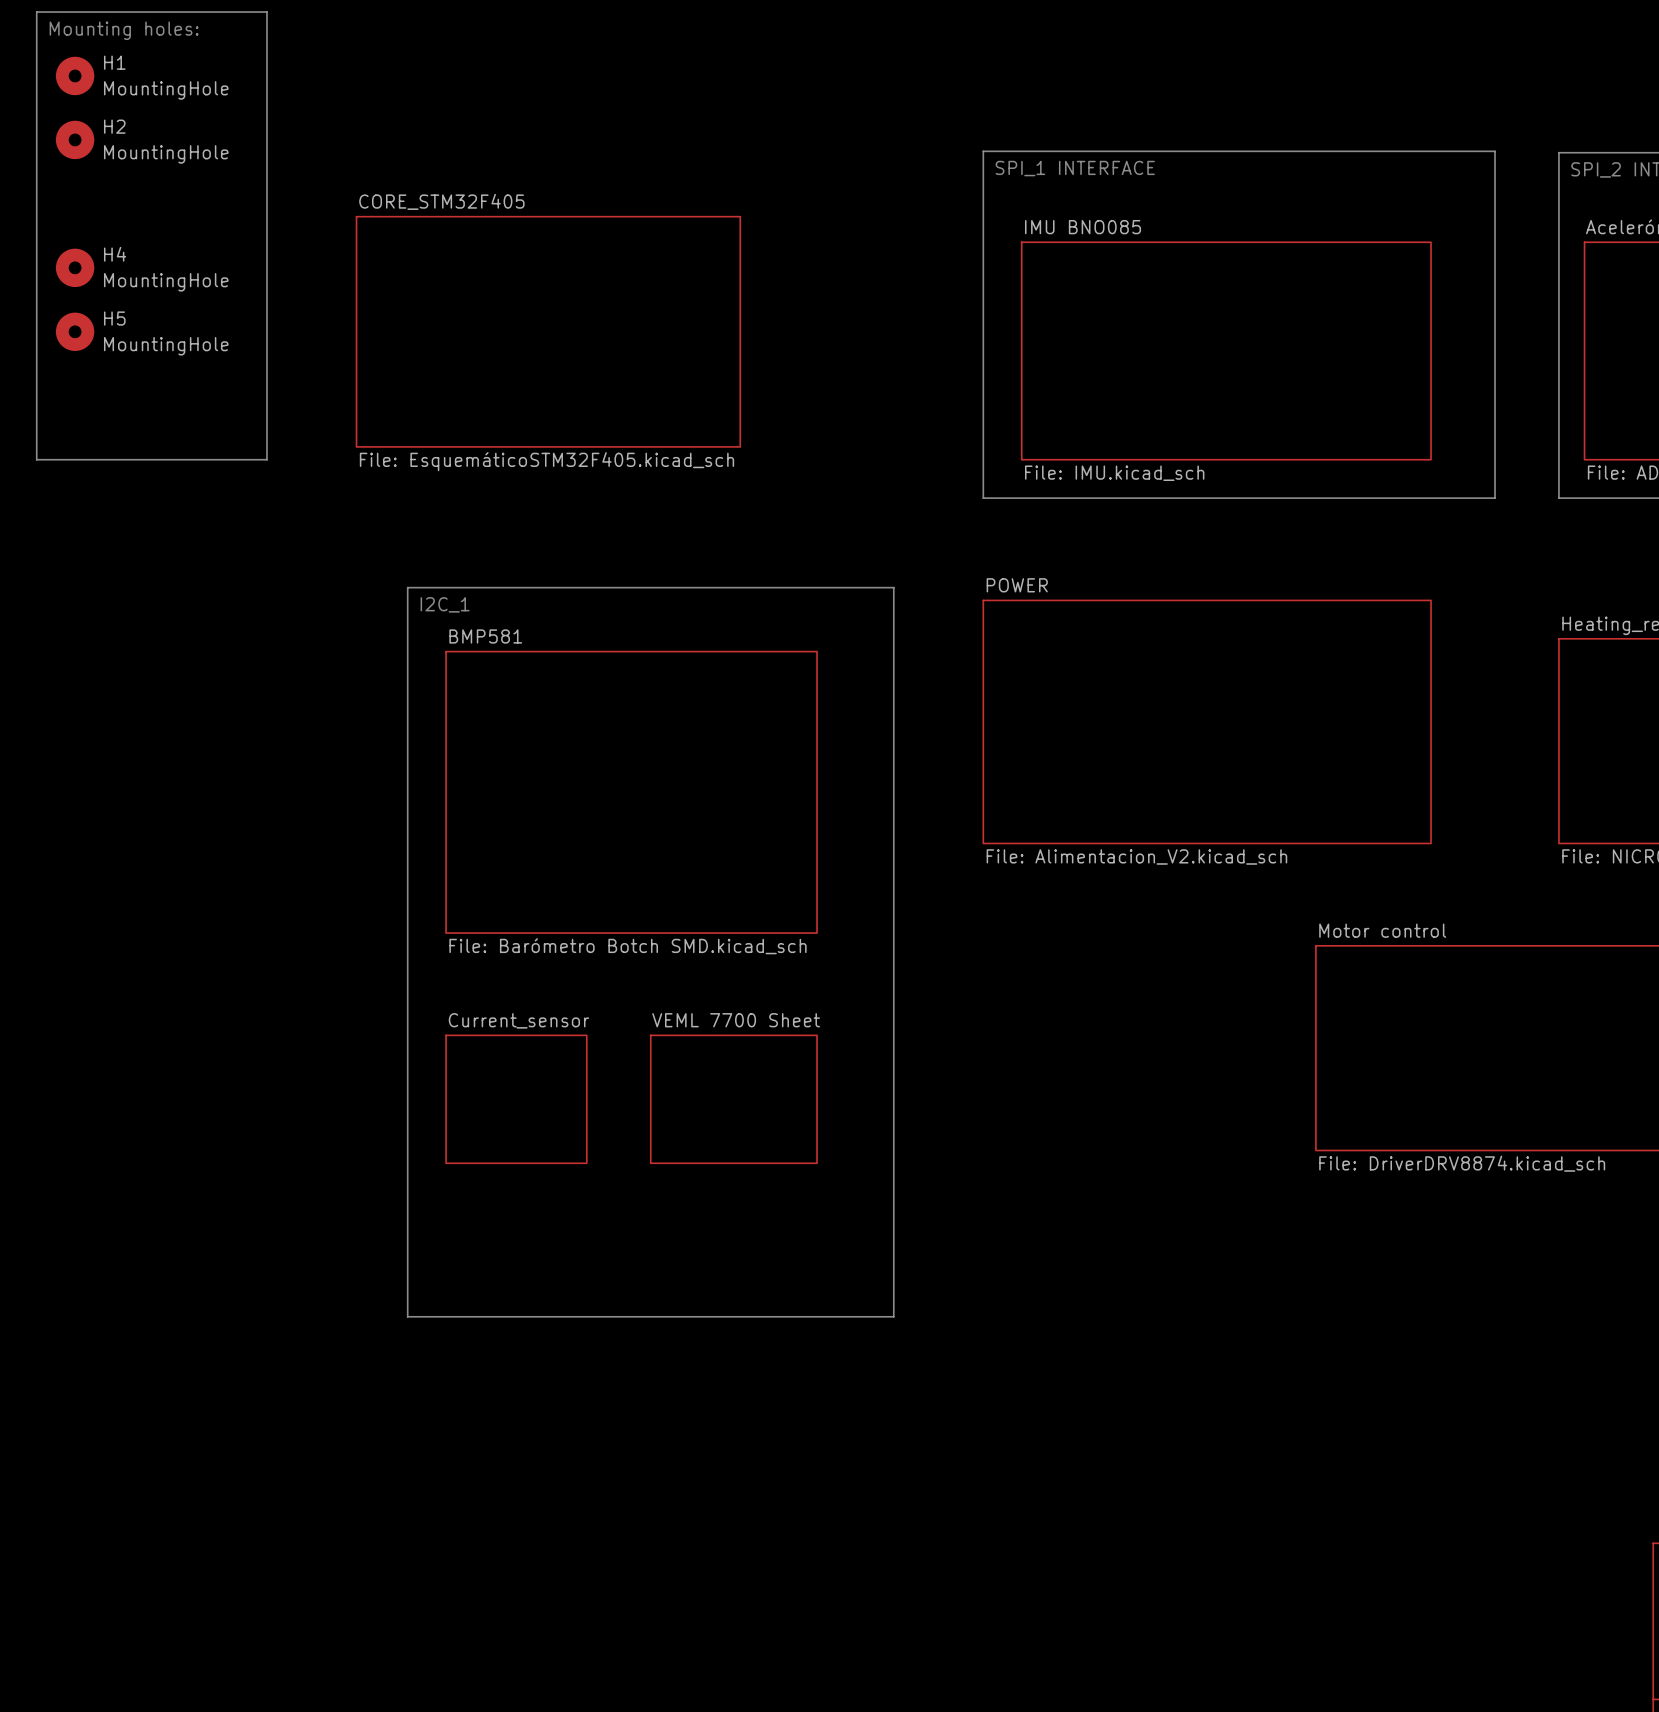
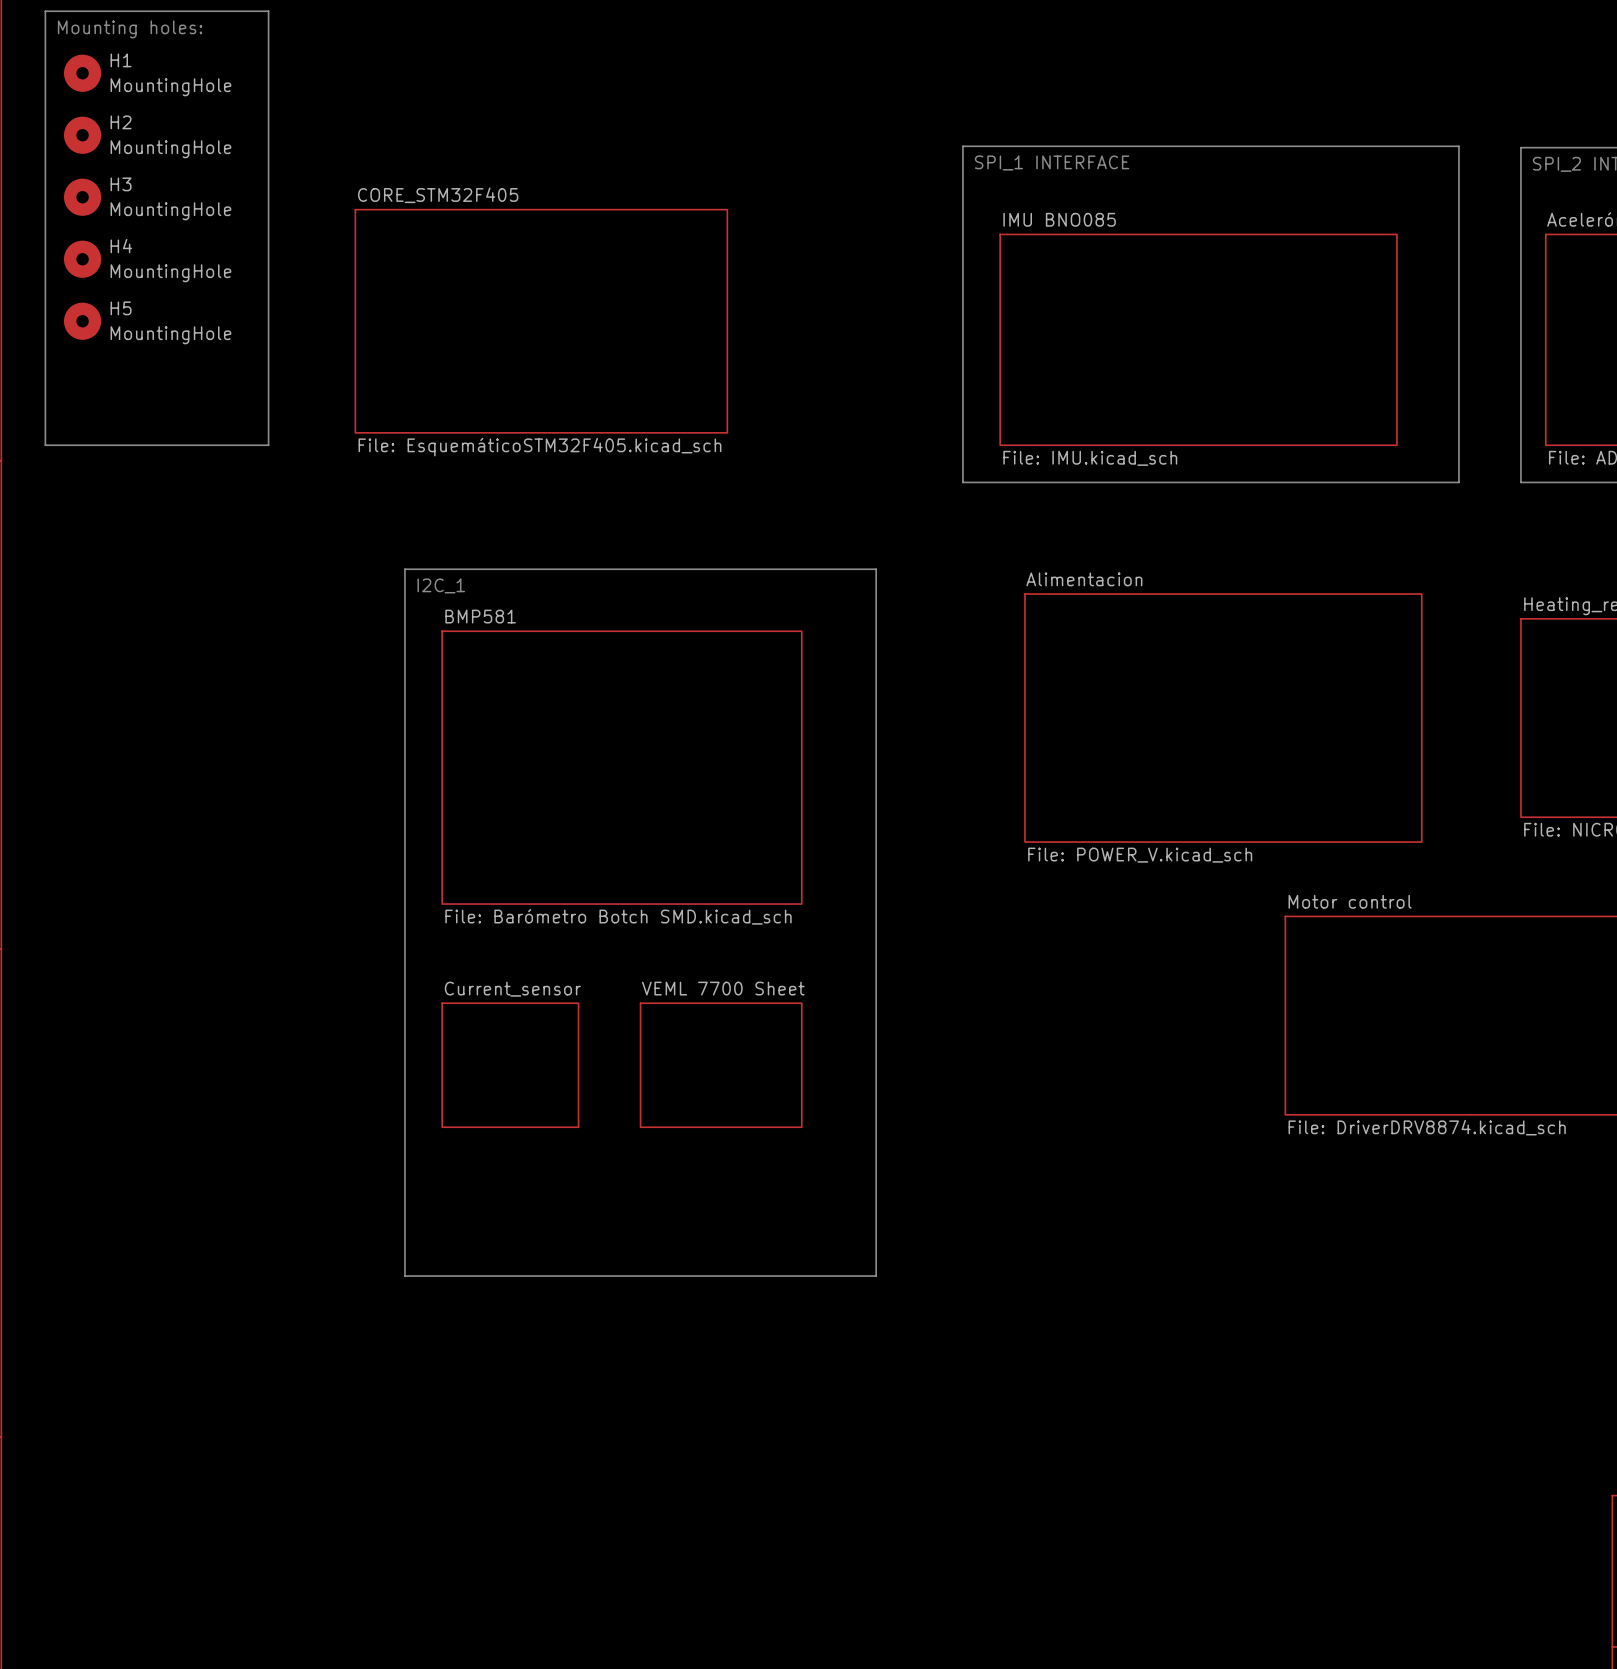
H3: none -> MountingHole (82, 197)
sheet POWER: File: Alimentacion_V2.kicad_sch (1207, 721) -> none
sheet Alimentacion: none -> File: POWER_V.kicad_sch (1223, 718)

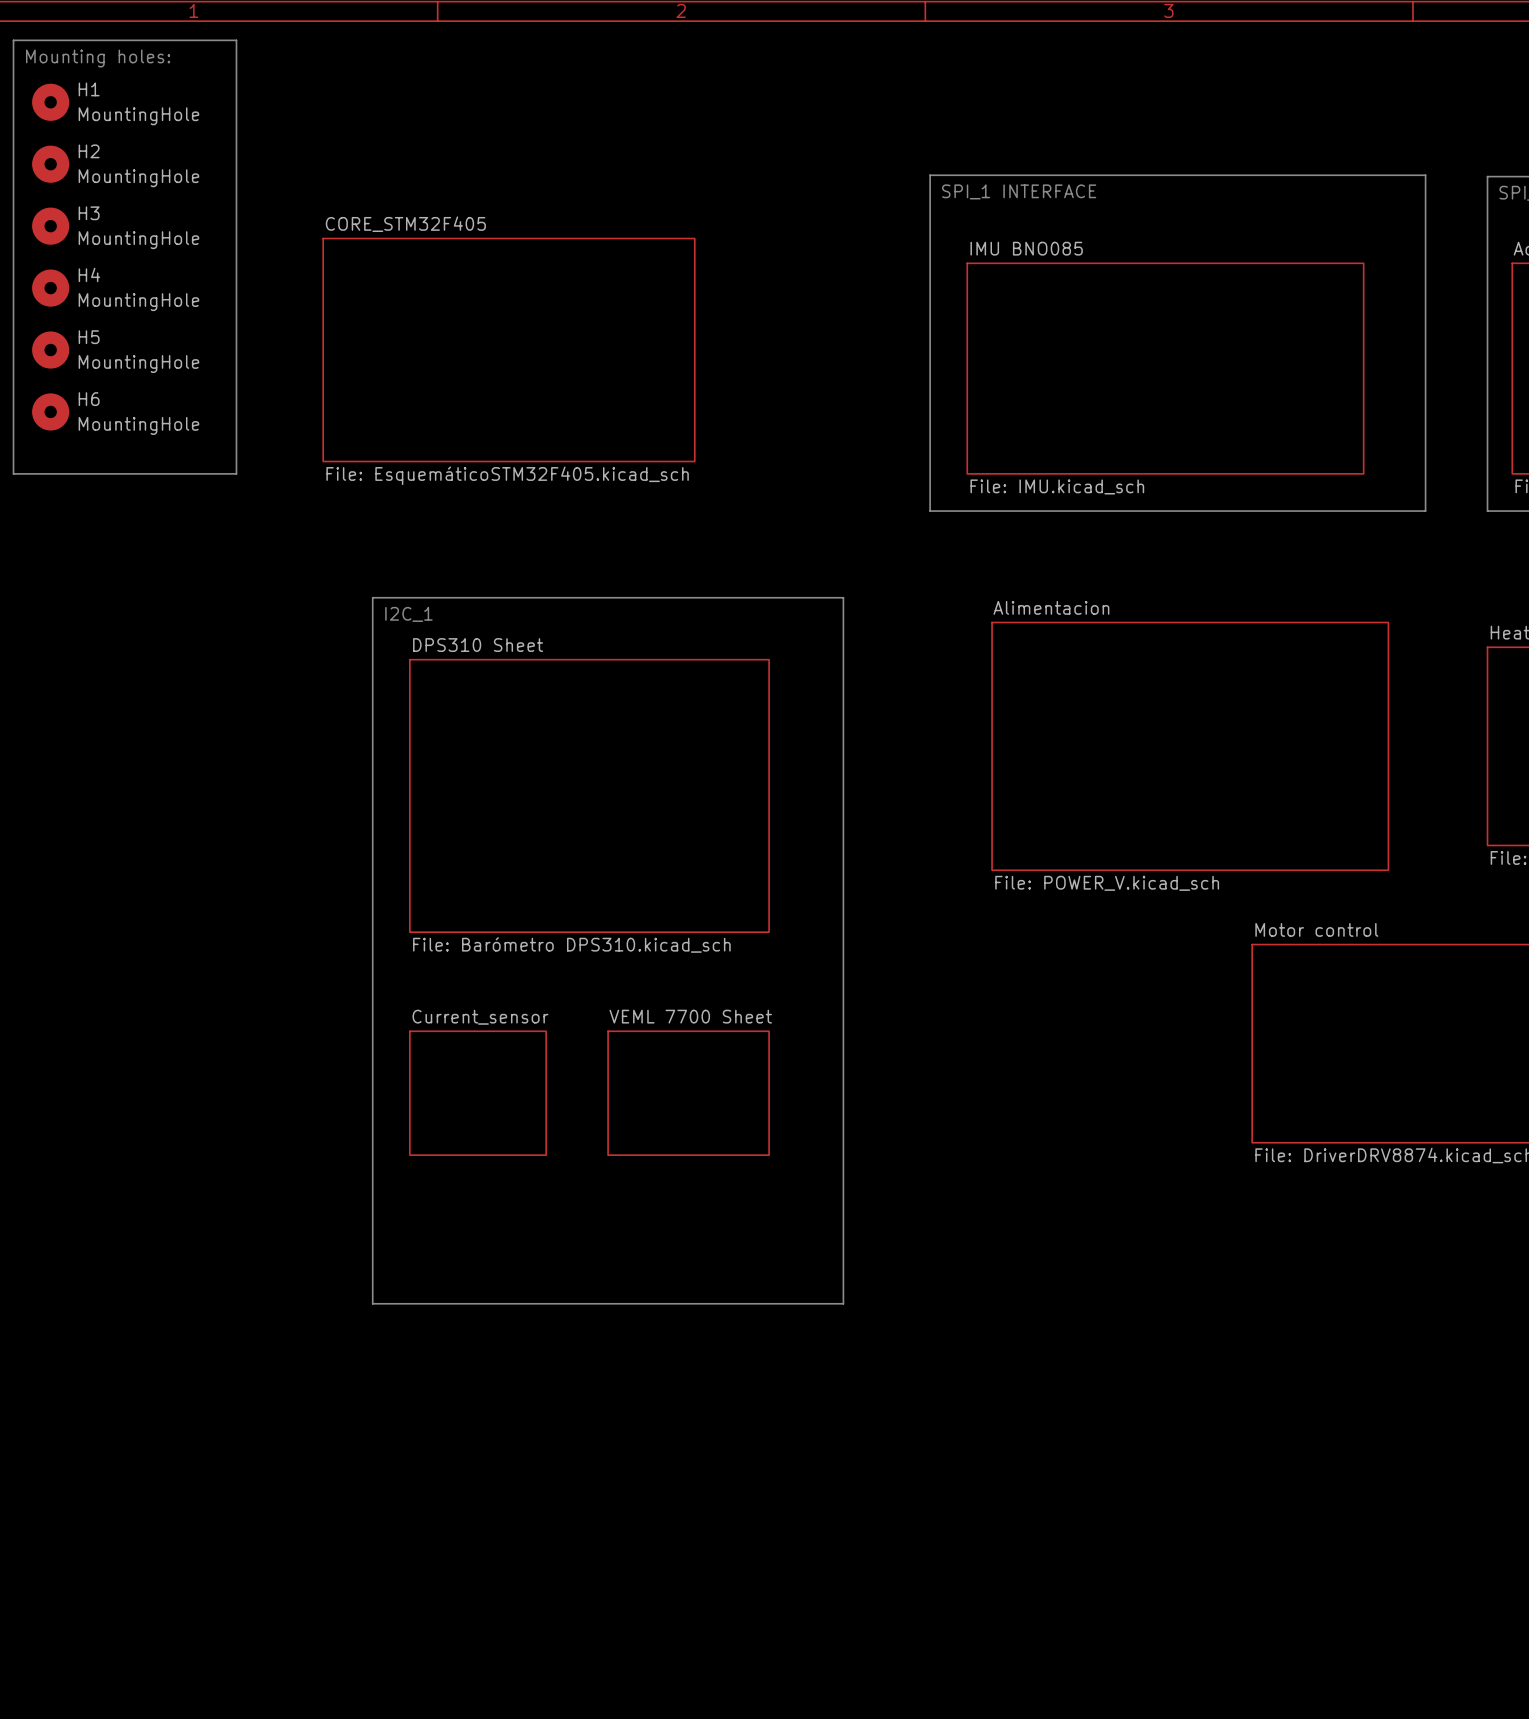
H6: none -> MountingHole (50, 411)
sheet BMP581 name: BMP581 (480, 616) -> DPS310 Sheet (478, 645)
sheet BMP581 value: File: Barómetro Botch SMD.kicad_sch (618, 916) -> File: Barómetro DPS310.kicad_sch (571, 944)

